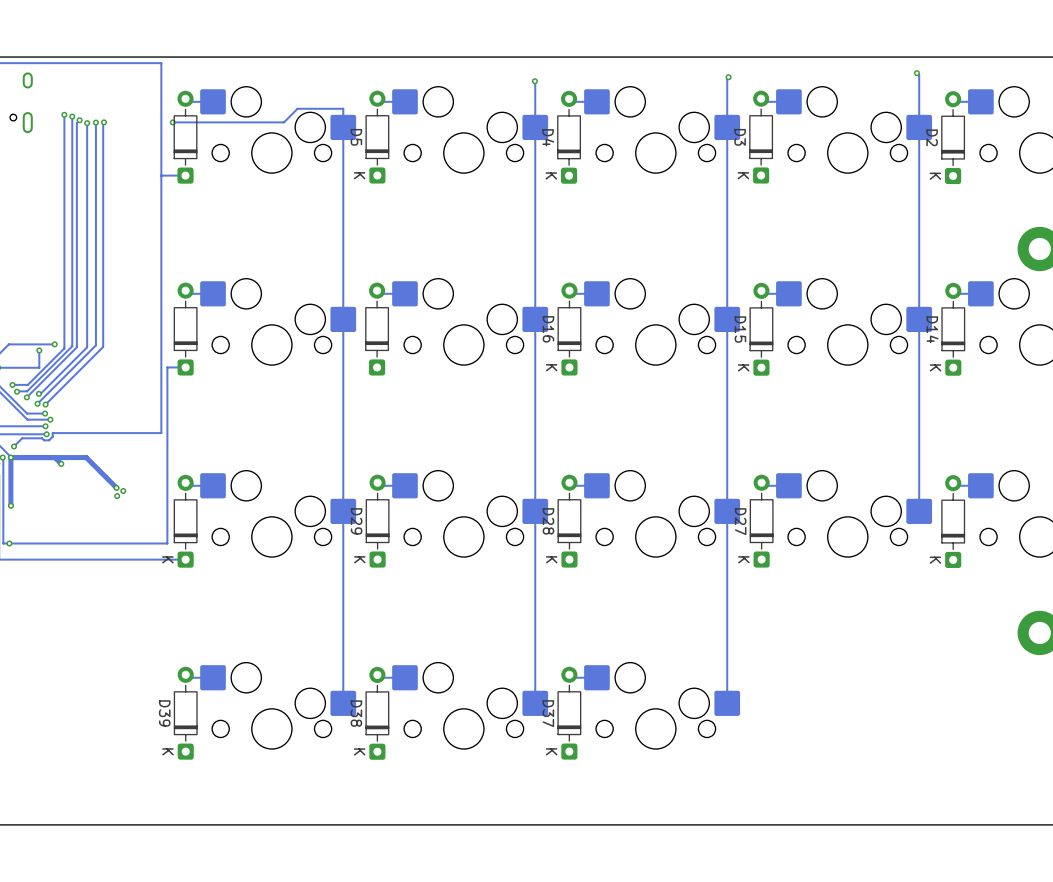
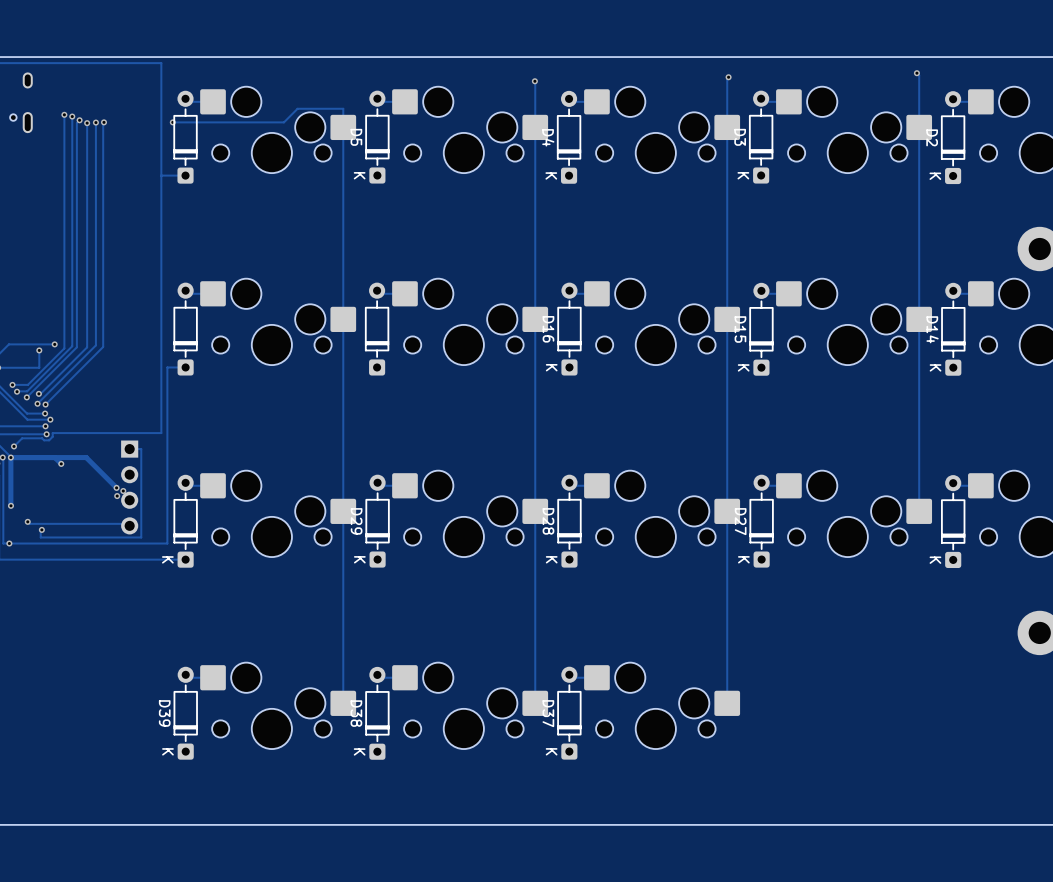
track: none -> (129, 449) (141, 449) (141, 537) (40, 537) (41, 529)
part: none -> (129, 487)
track: none -> (27, 521) (29, 523) (127, 523) (129, 525)
via: none -> (27, 521)
via: none -> (41, 529)

